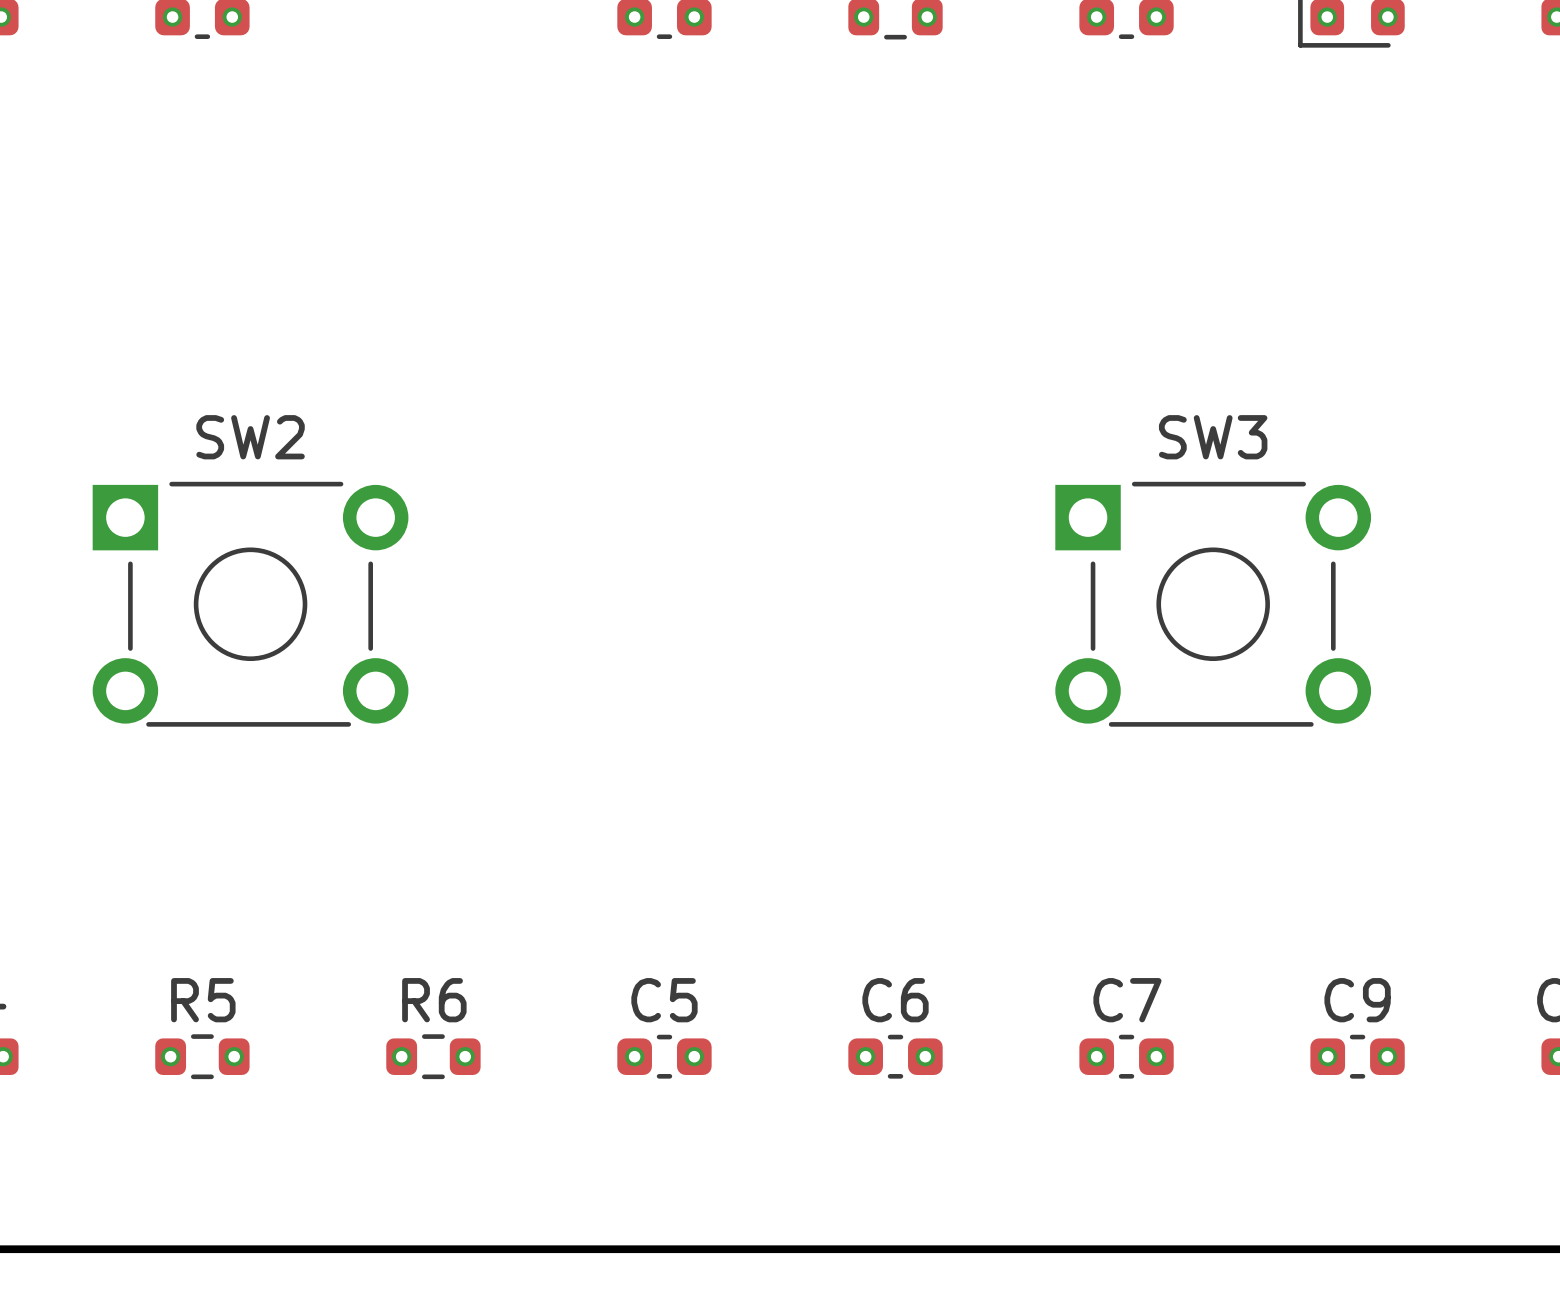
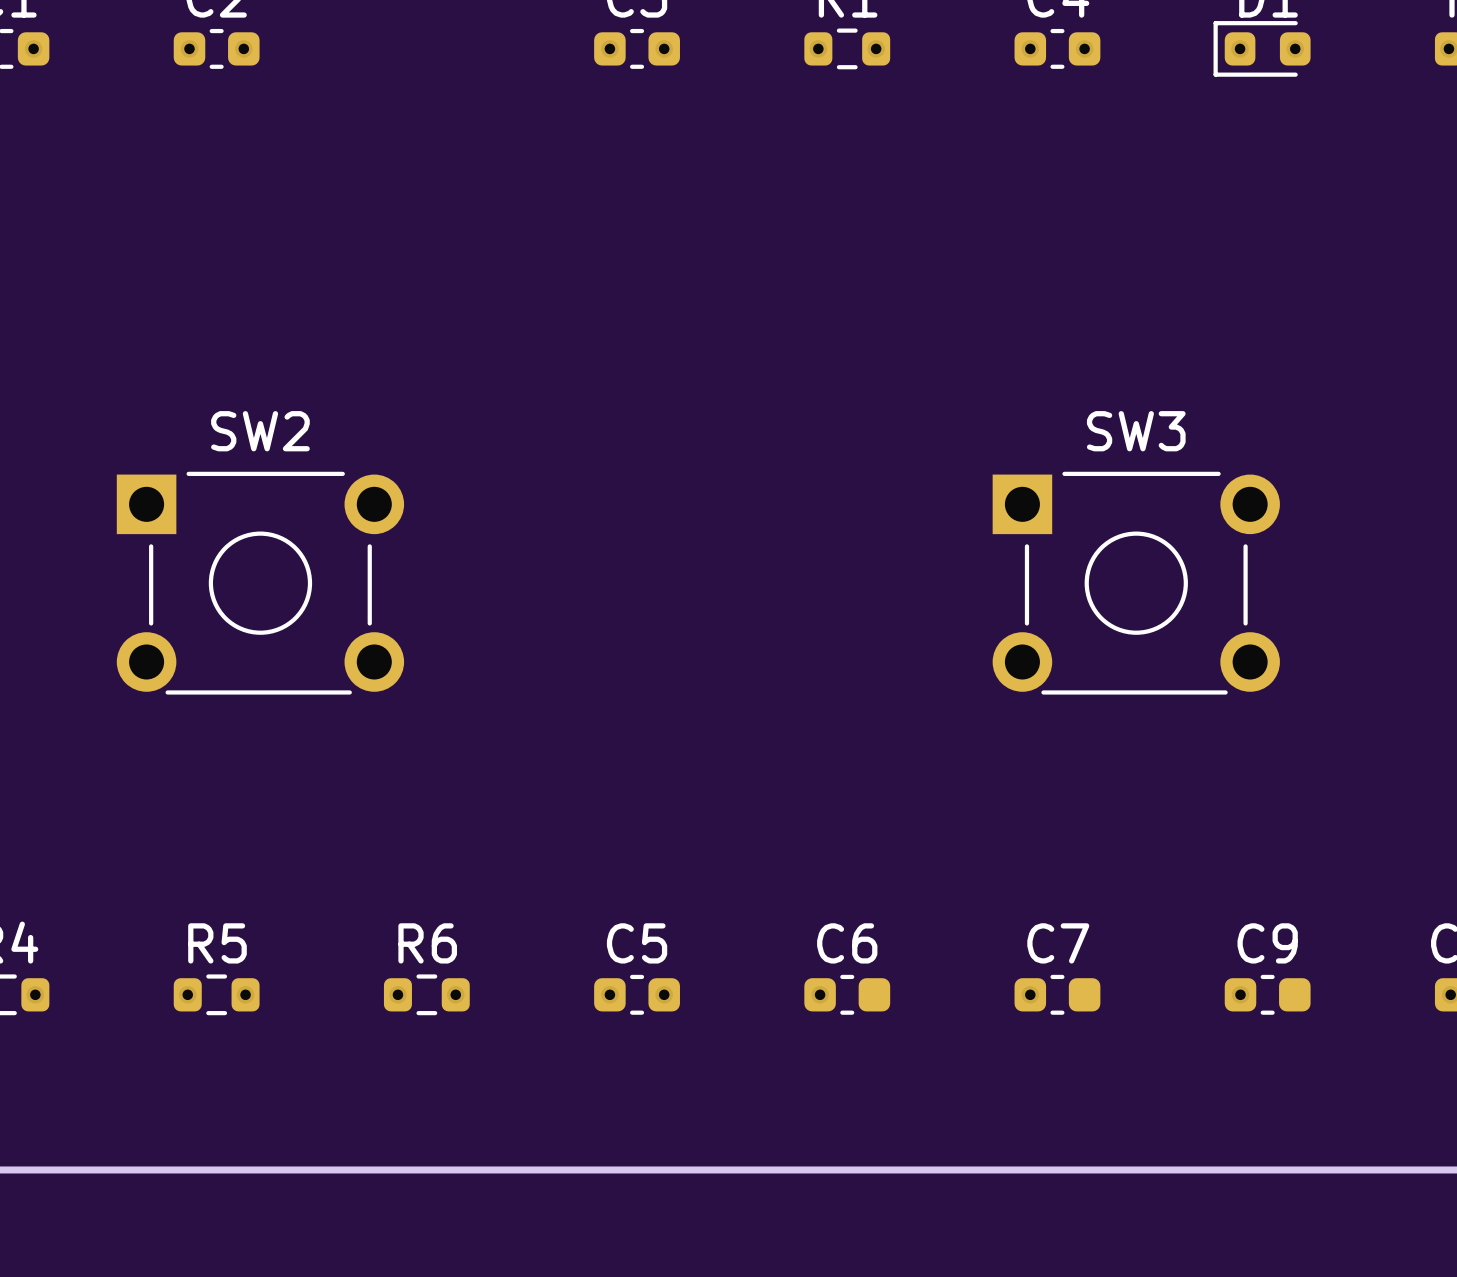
via: (925, 1056) -> none
via: (1156, 1056) -> none
via: (1387, 1056) -> none

